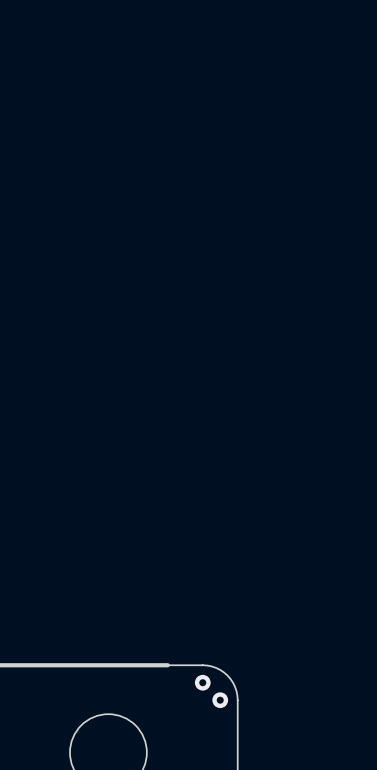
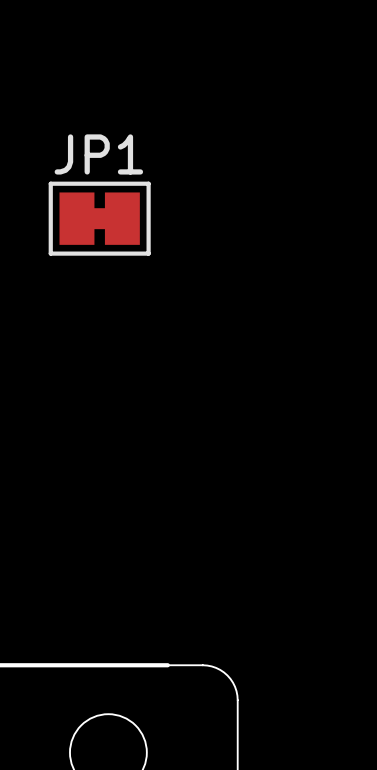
JP1: none -> (99, 218)
via: (202, 682) -> none
via: (220, 700) -> none

